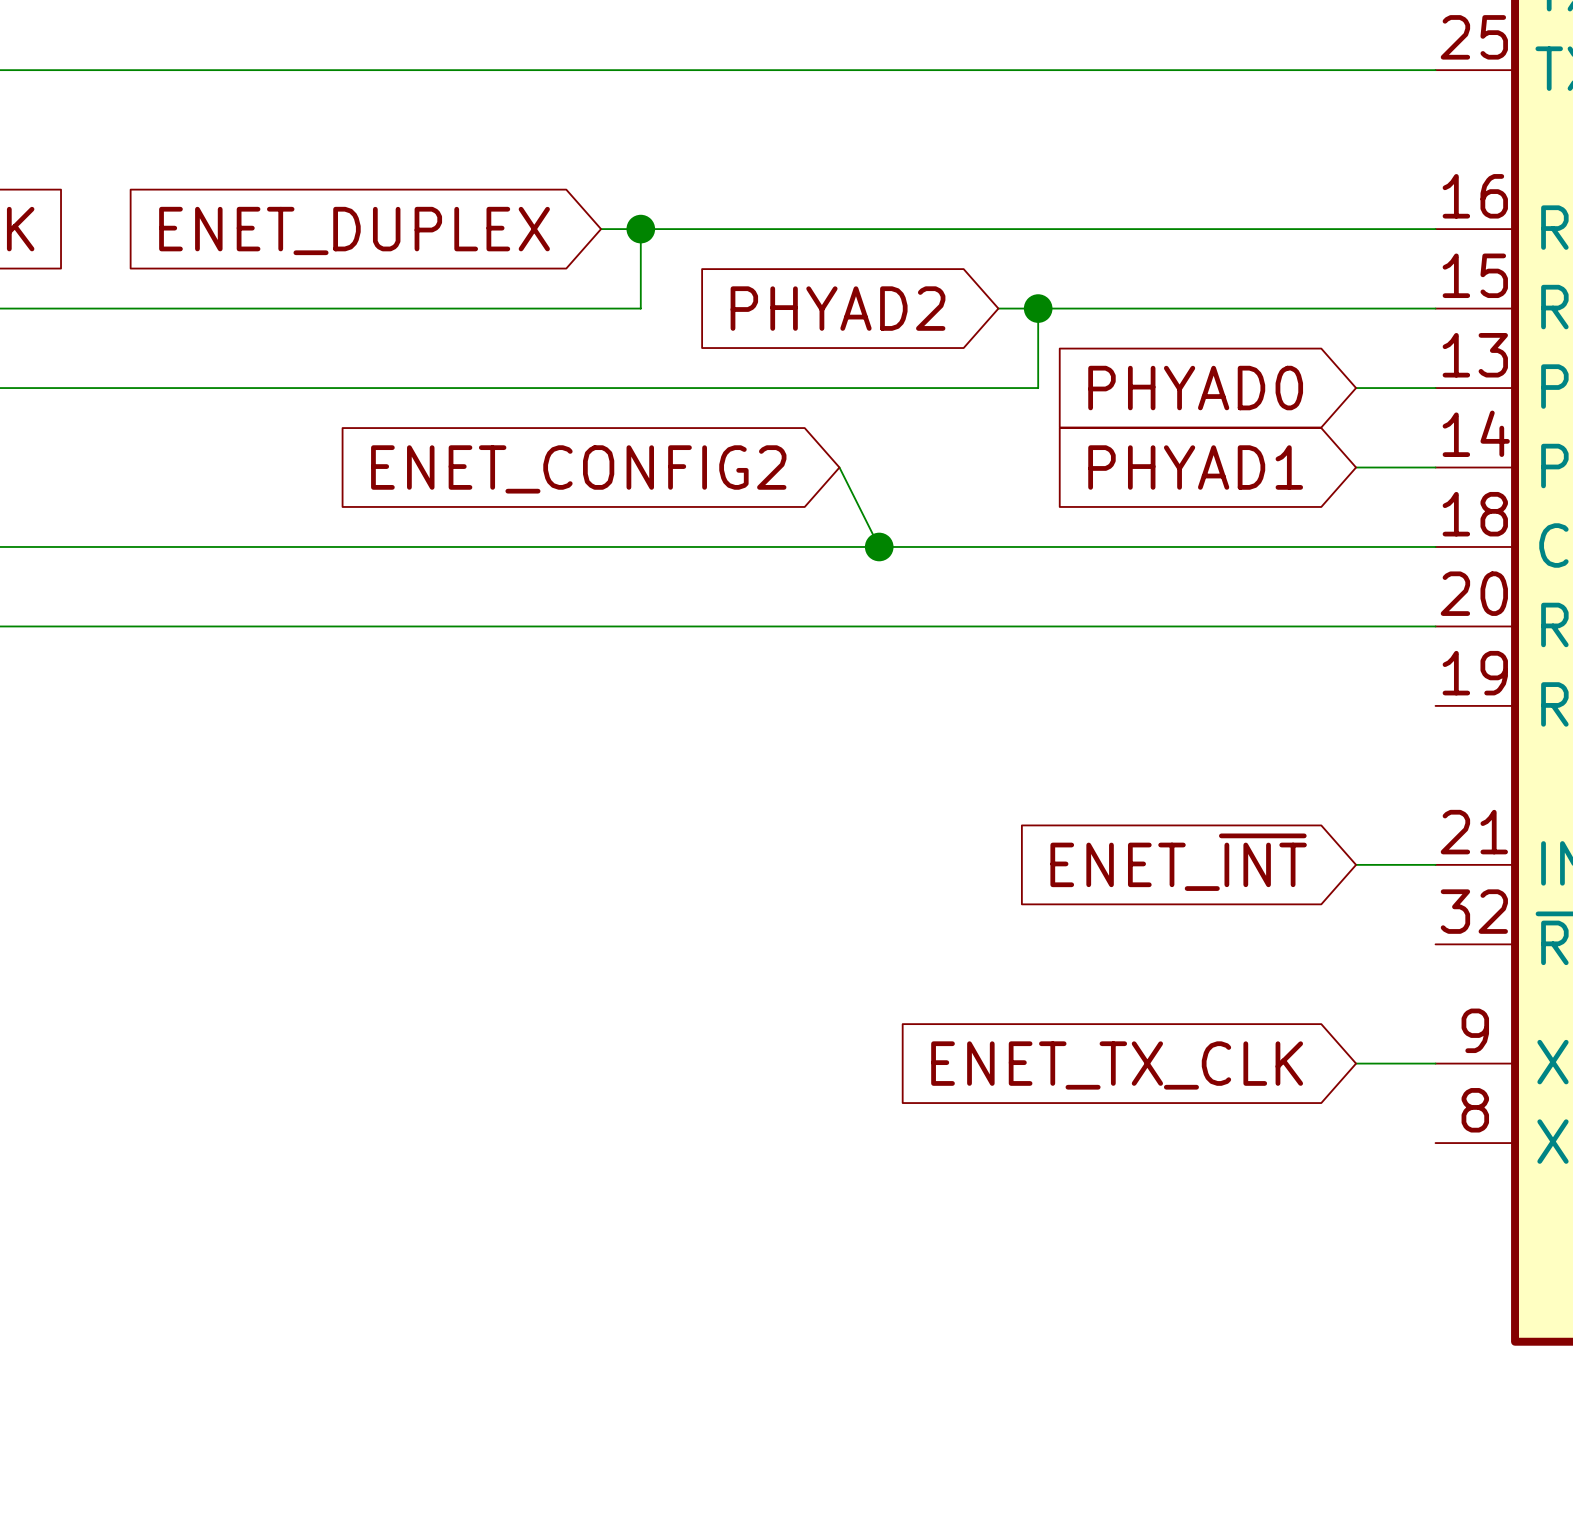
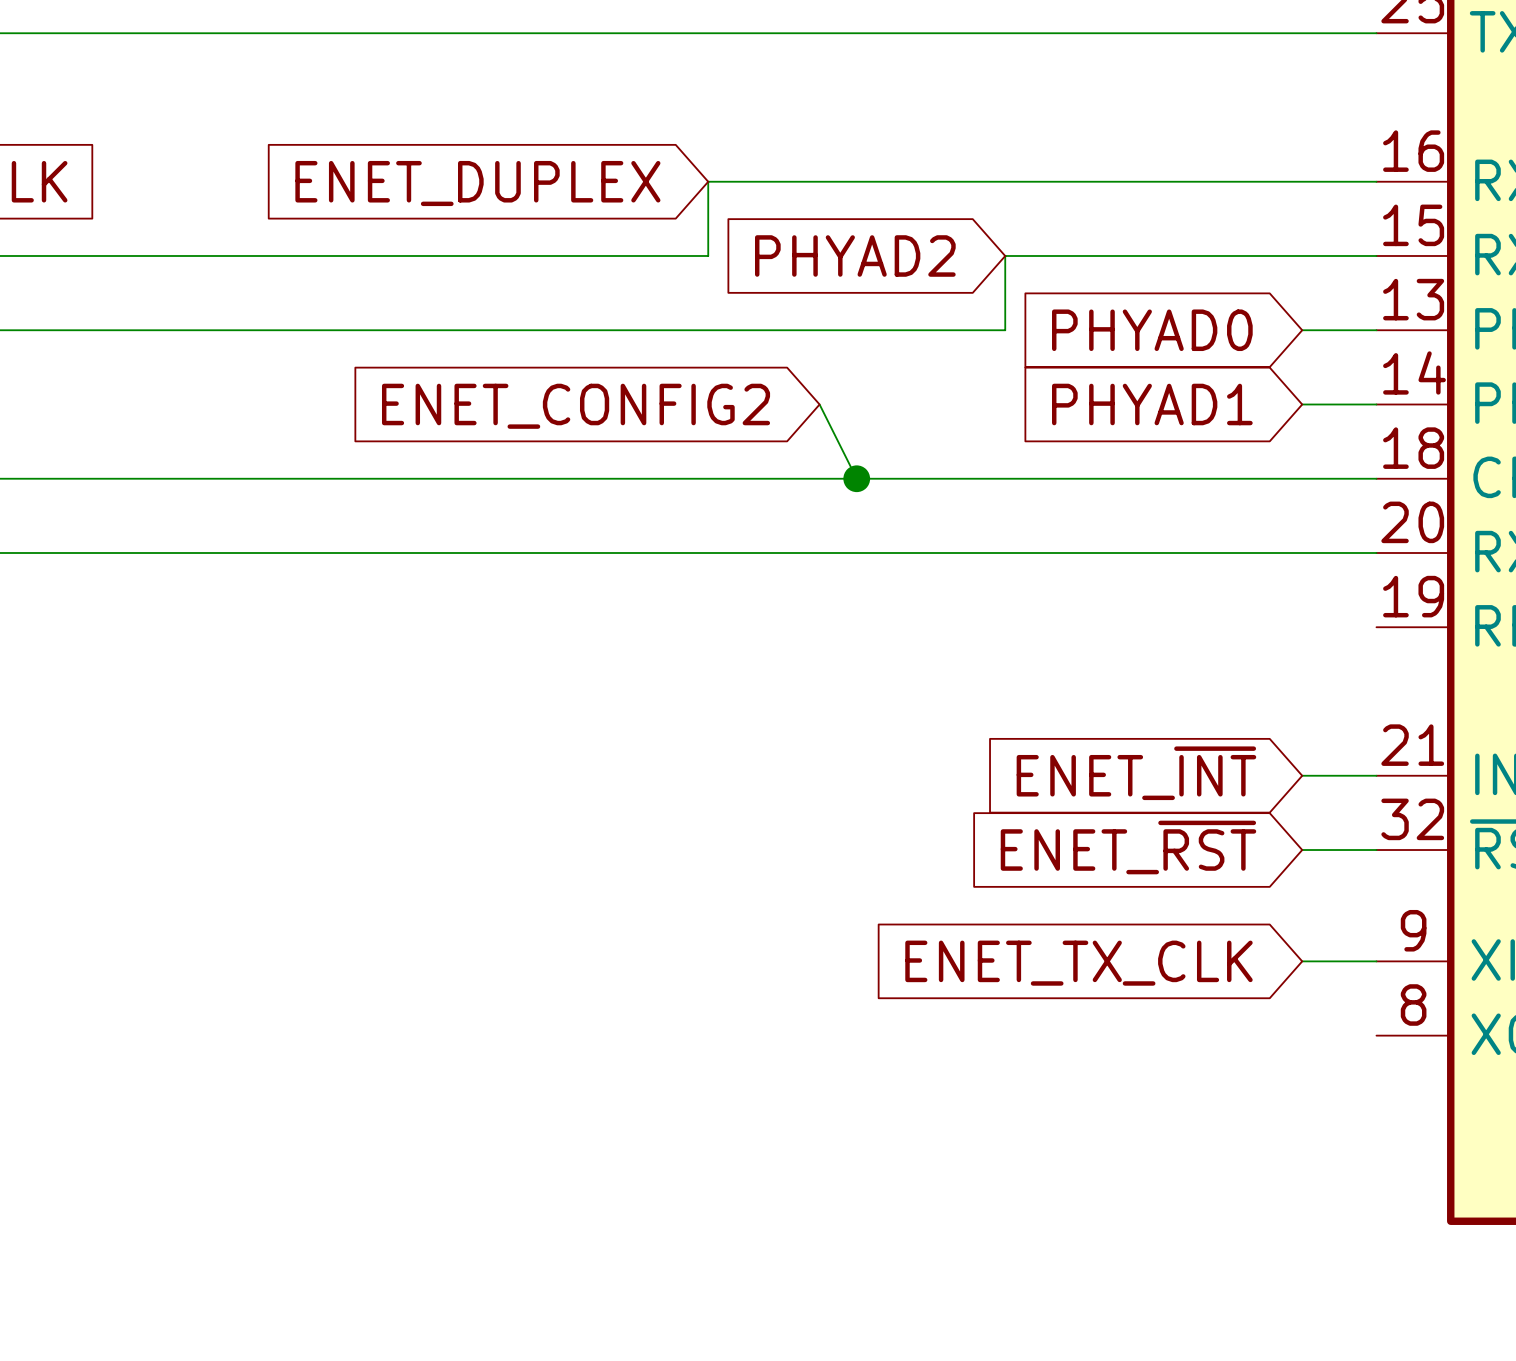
wire: (601, 229) (720, 229) -> none
wire: (640, 229) (640, 308) -> (708, 181) (708, 255) (633, 255)
junction: (640, 229) -> none
global label position: ENET_DUPLEX (354, 230) -> ENET_DUPLEX (477, 183)
global label position: PHYAD2 (838, 308) -> PHYAD2 (855, 255)
wire: (998, 308) (1038, 308) -> none
junction: (1038, 308) -> none
global label: none -> ENET_~{RST} (1128, 847)
wire: none -> (1302, 850) (1376, 850)

